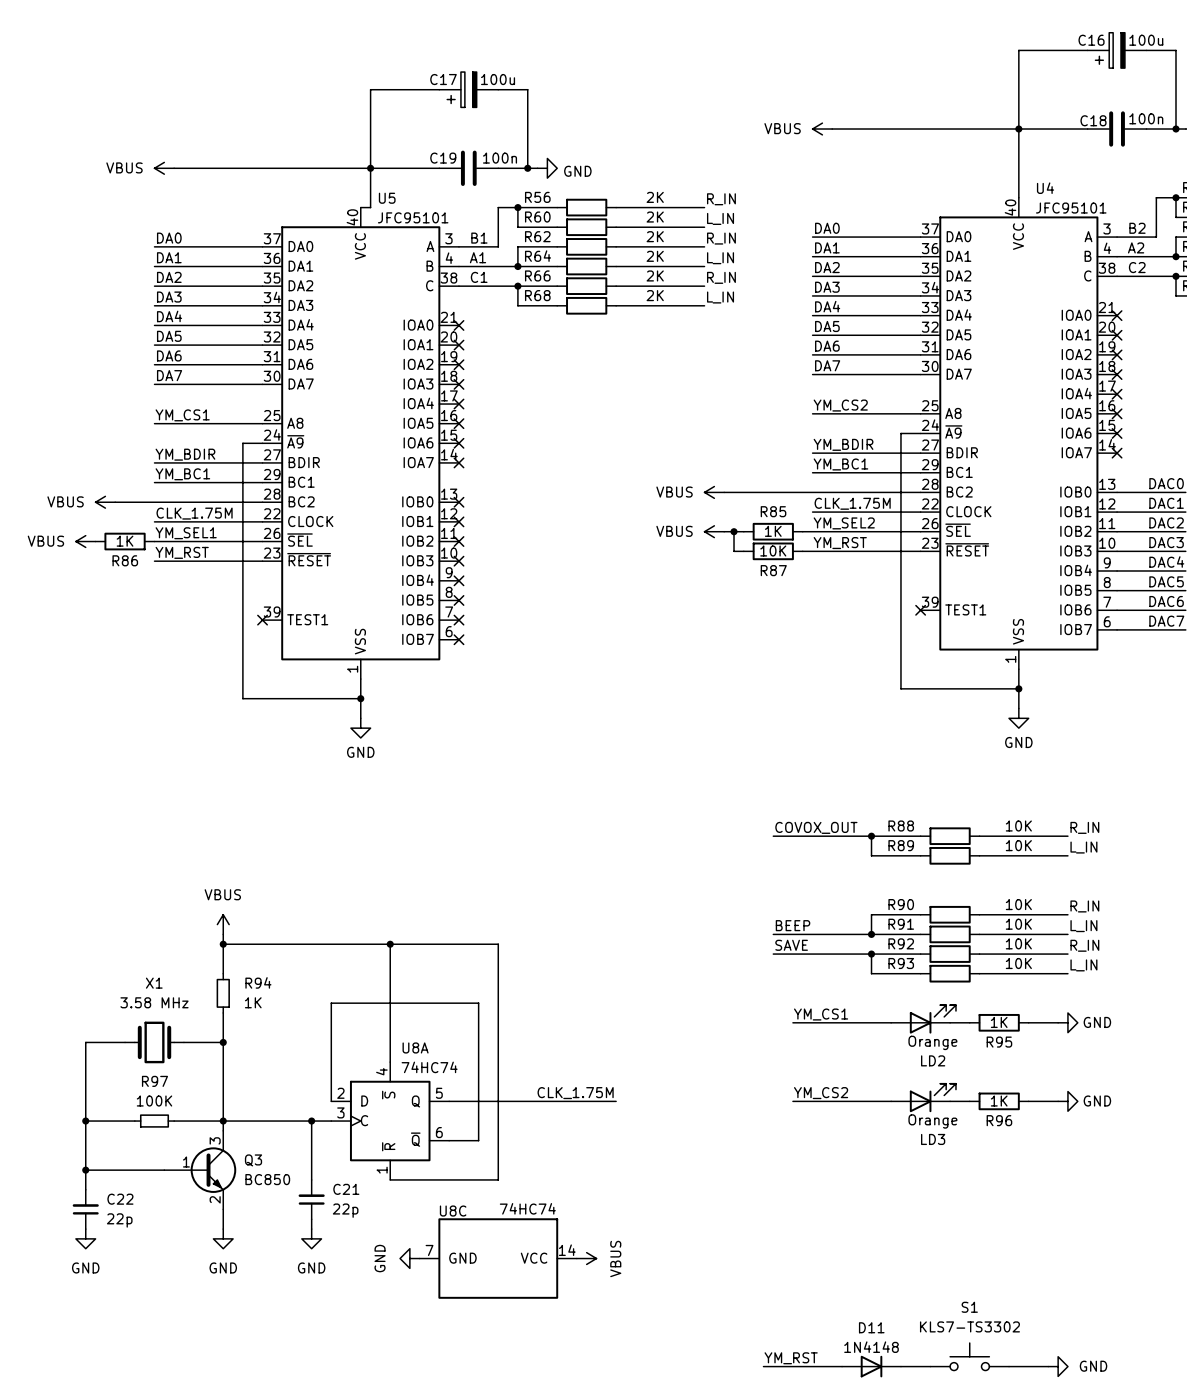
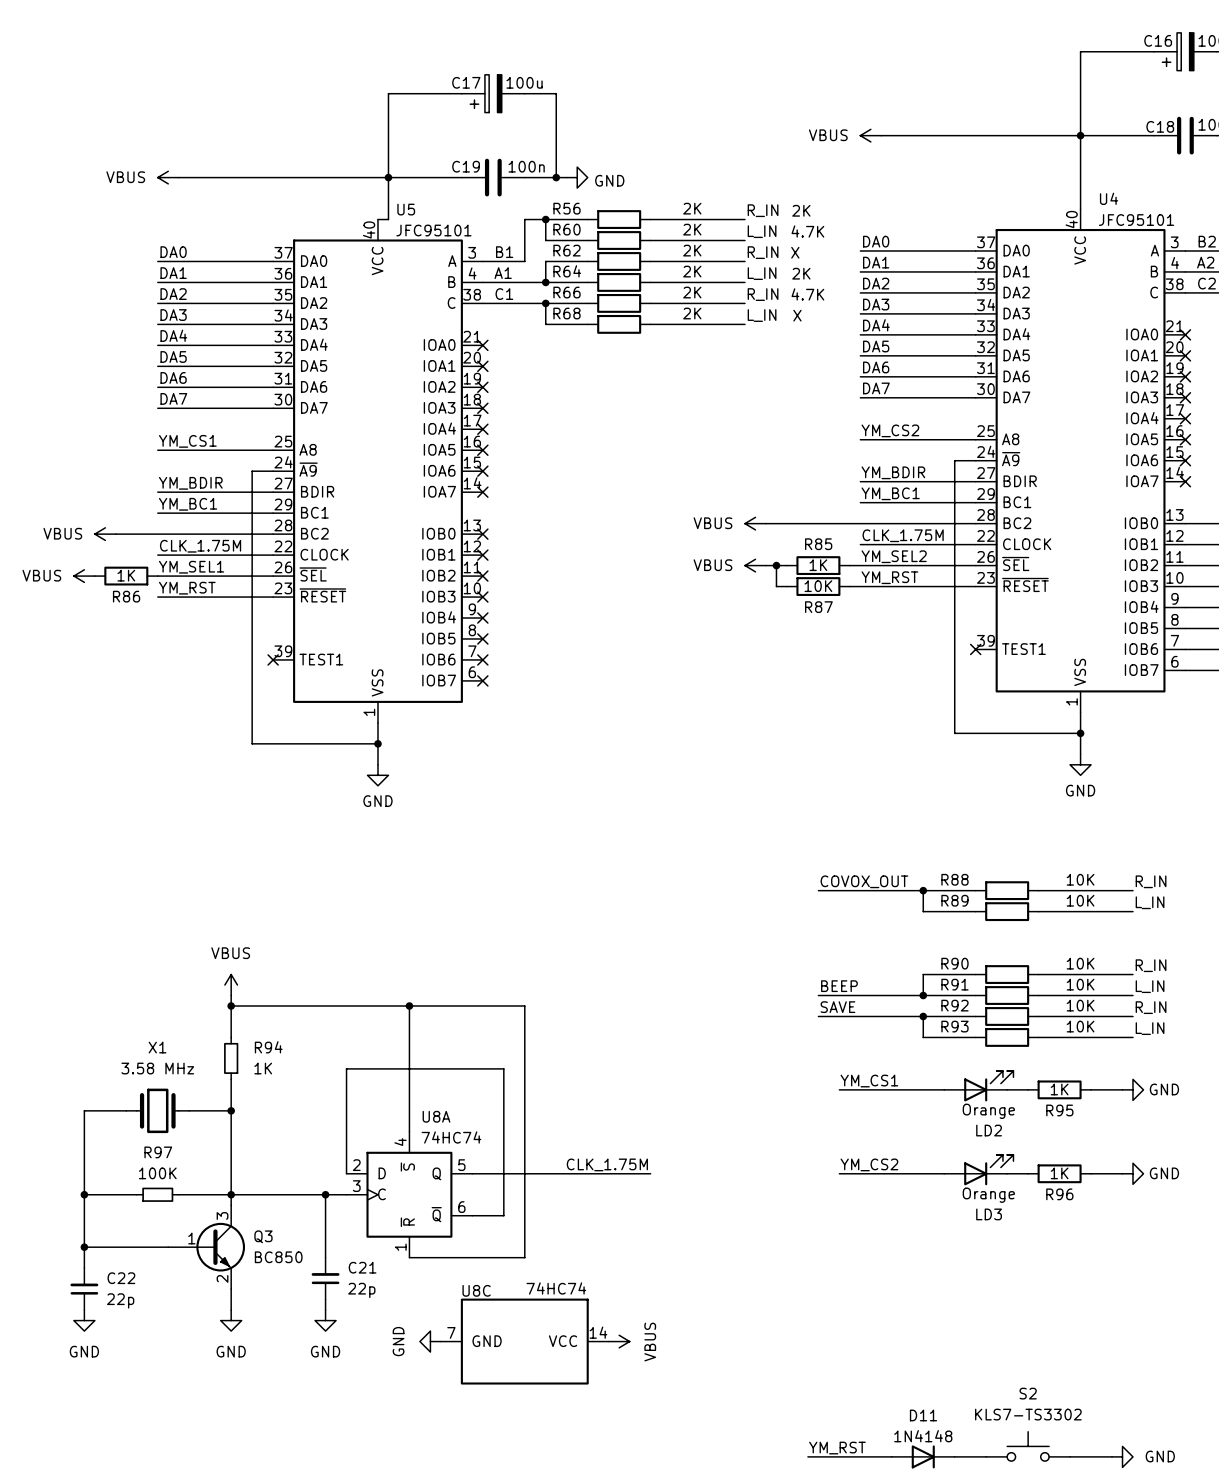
text: none -> 2K (801, 210)
text: none -> 4.7K (807, 231)
text: none -> X (795, 252)
text: none -> 2K (801, 273)
text: none -> 4.7K (807, 294)
text: none -> X (797, 315)
S1 name: S1 (969, 1307) -> S2 (1028, 1393)

